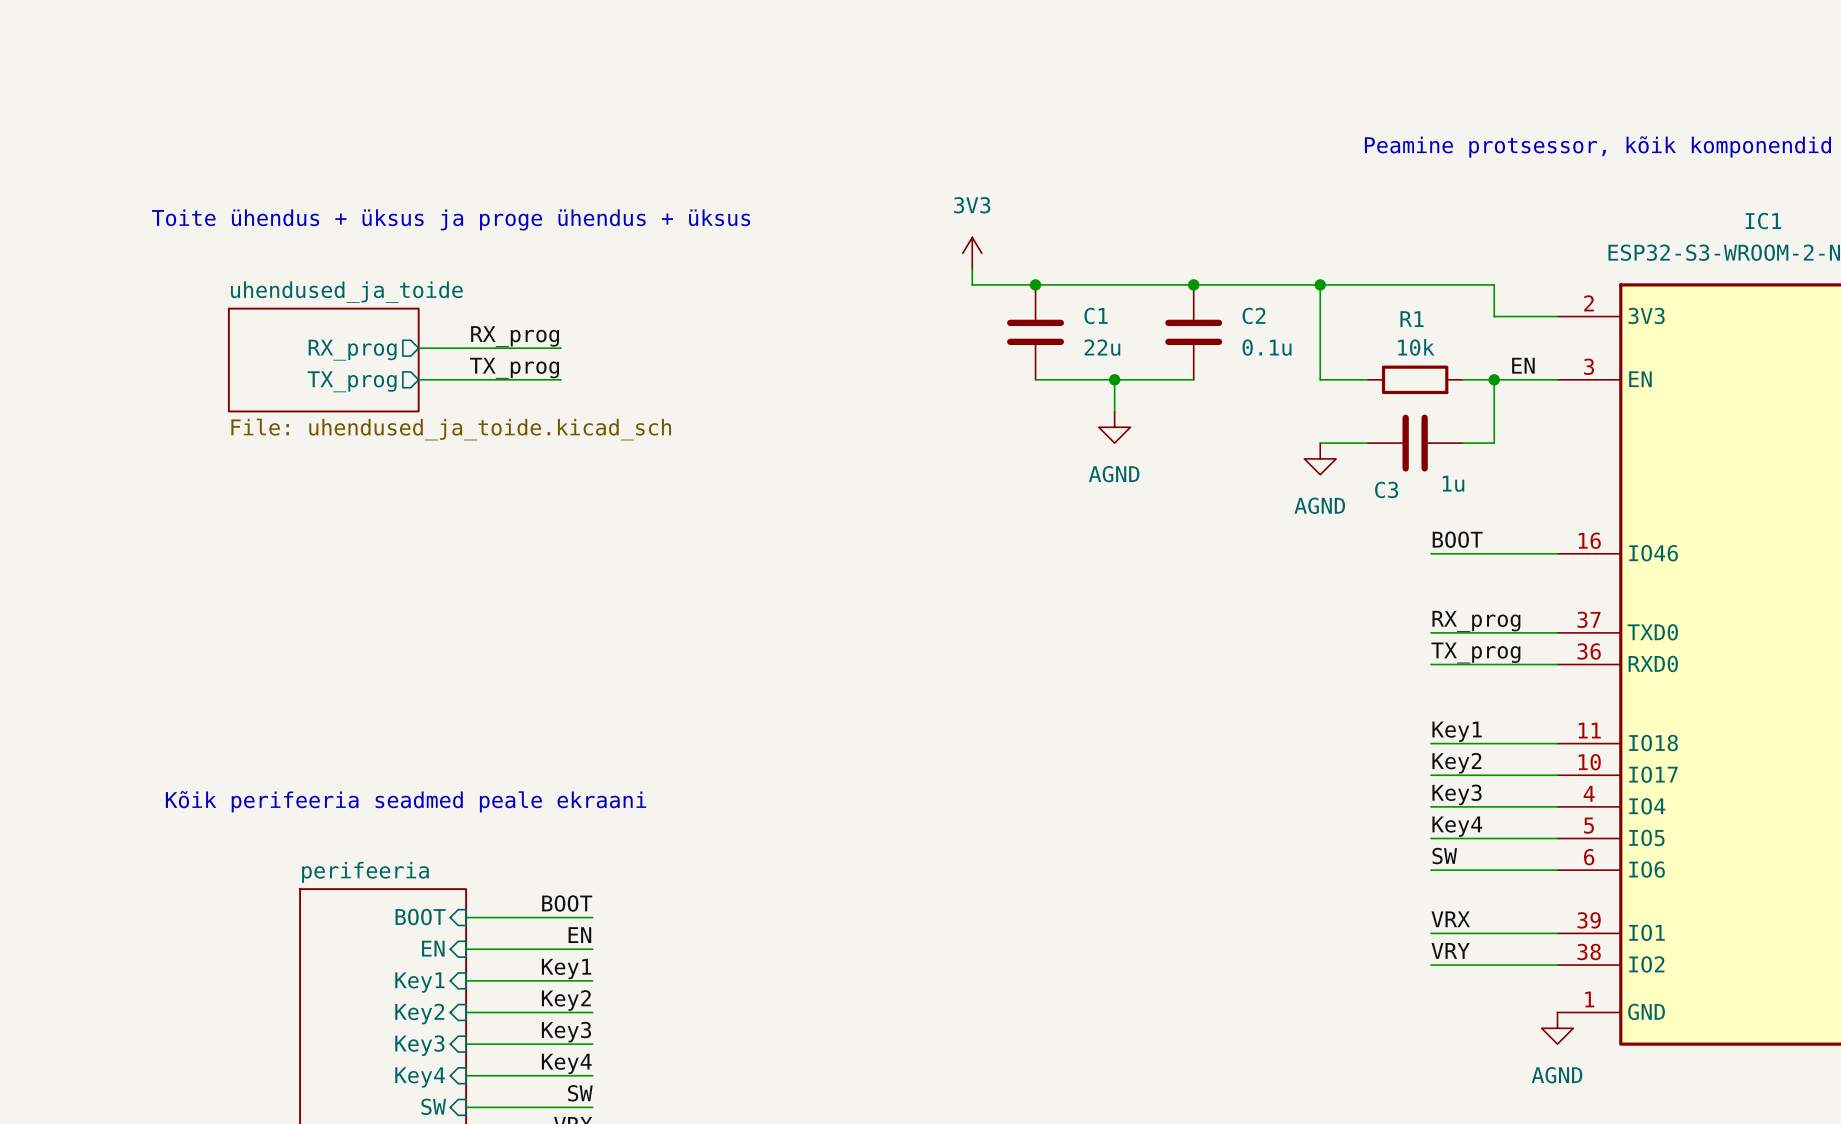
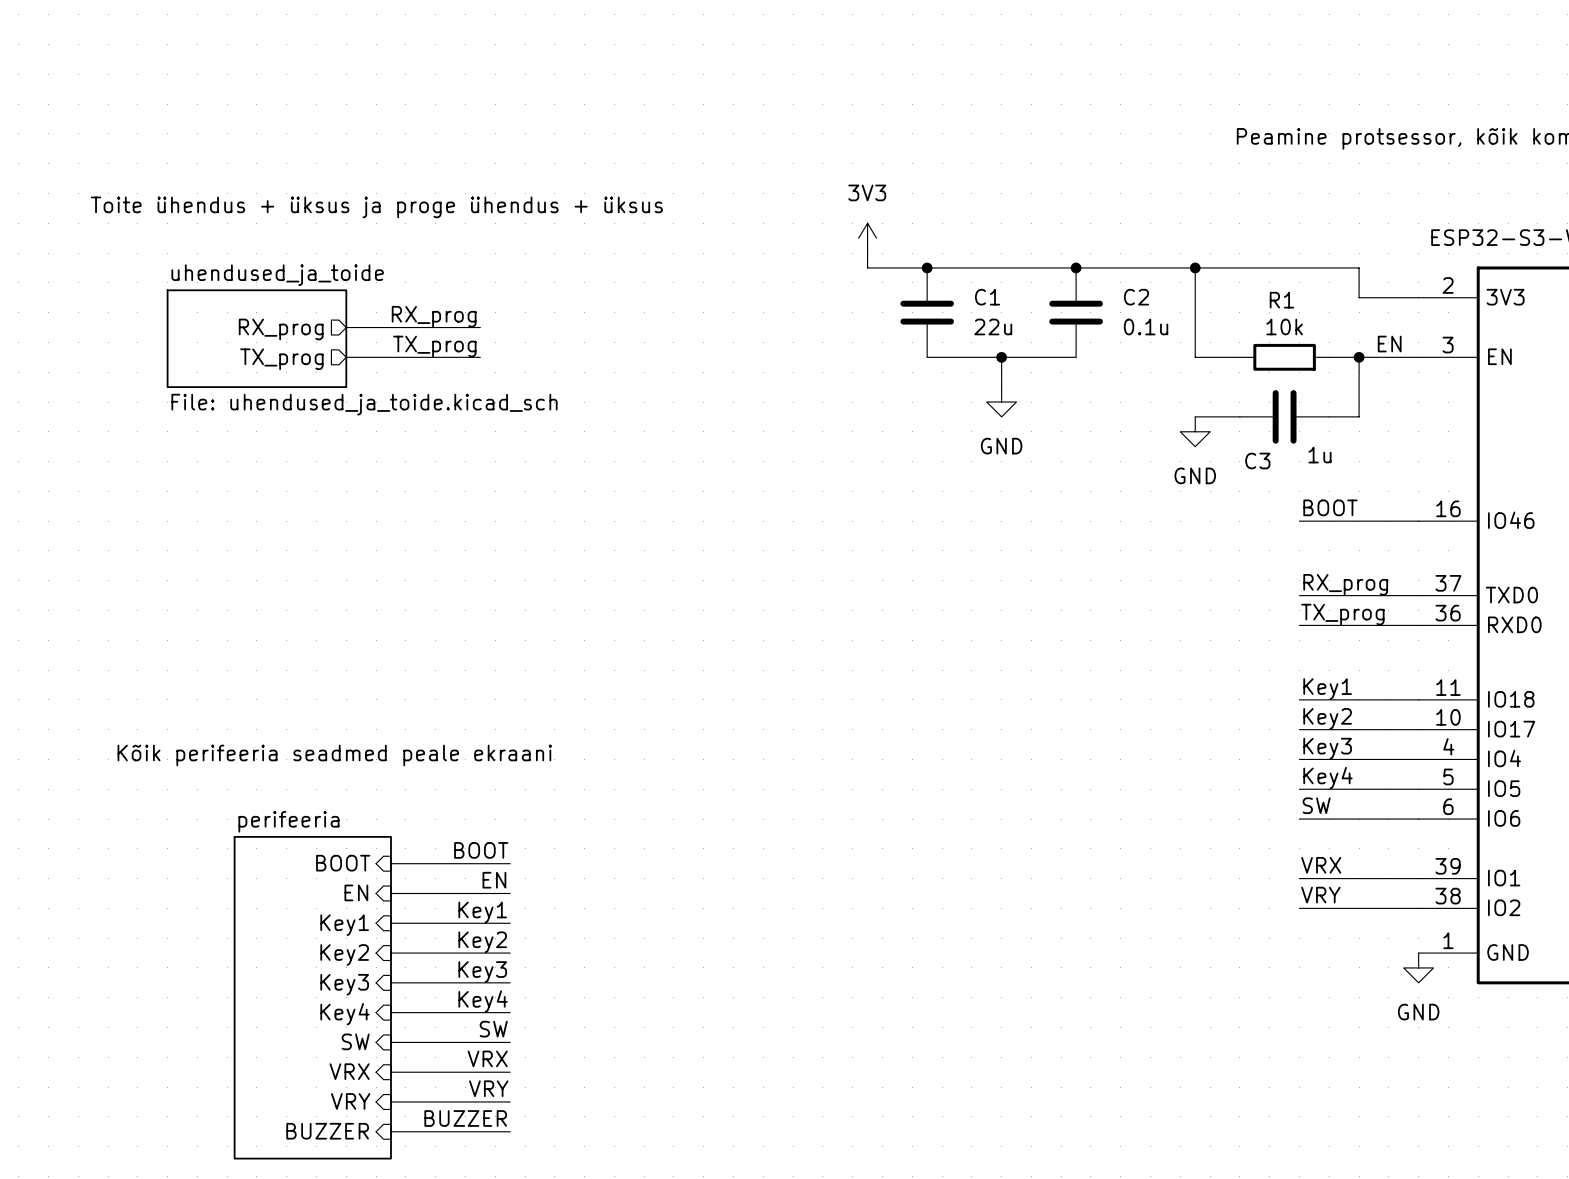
power symbol: AGND (1114, 427) -> GND (1001, 402)
power symbol: AGND (1320, 458) -> GND (1195, 431)
power symbol: AGND (1557, 1028) -> GND (1418, 967)

